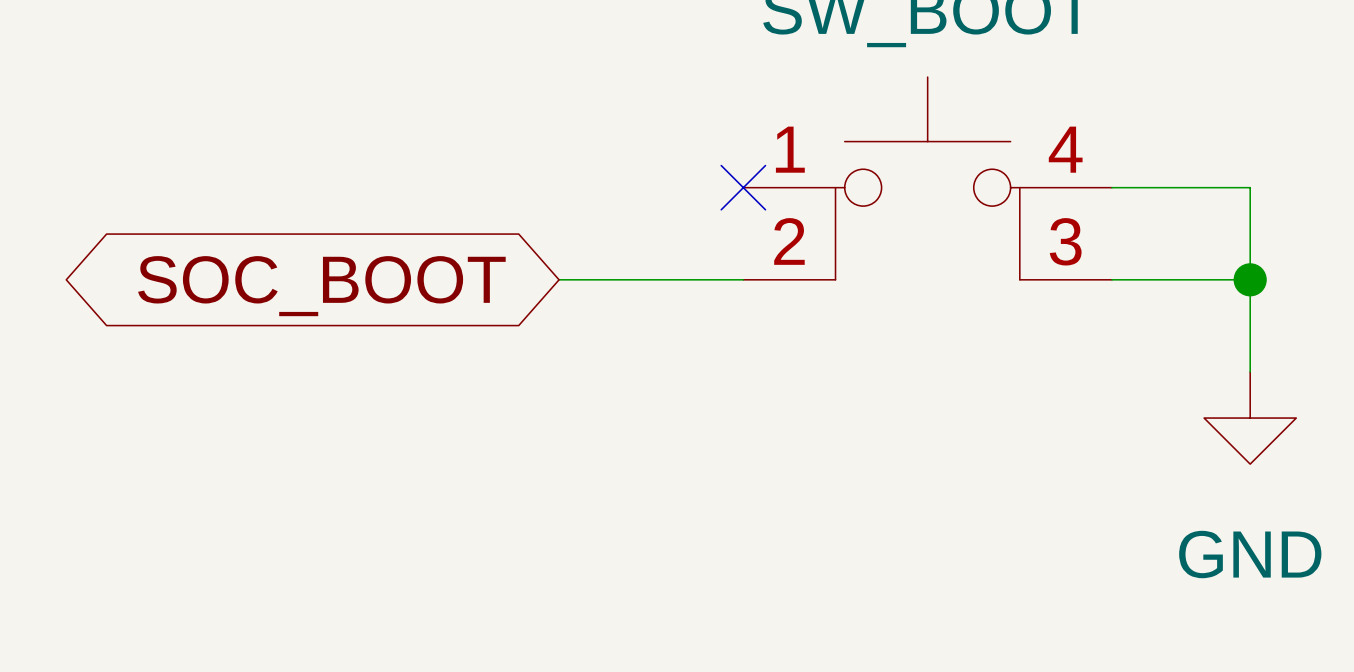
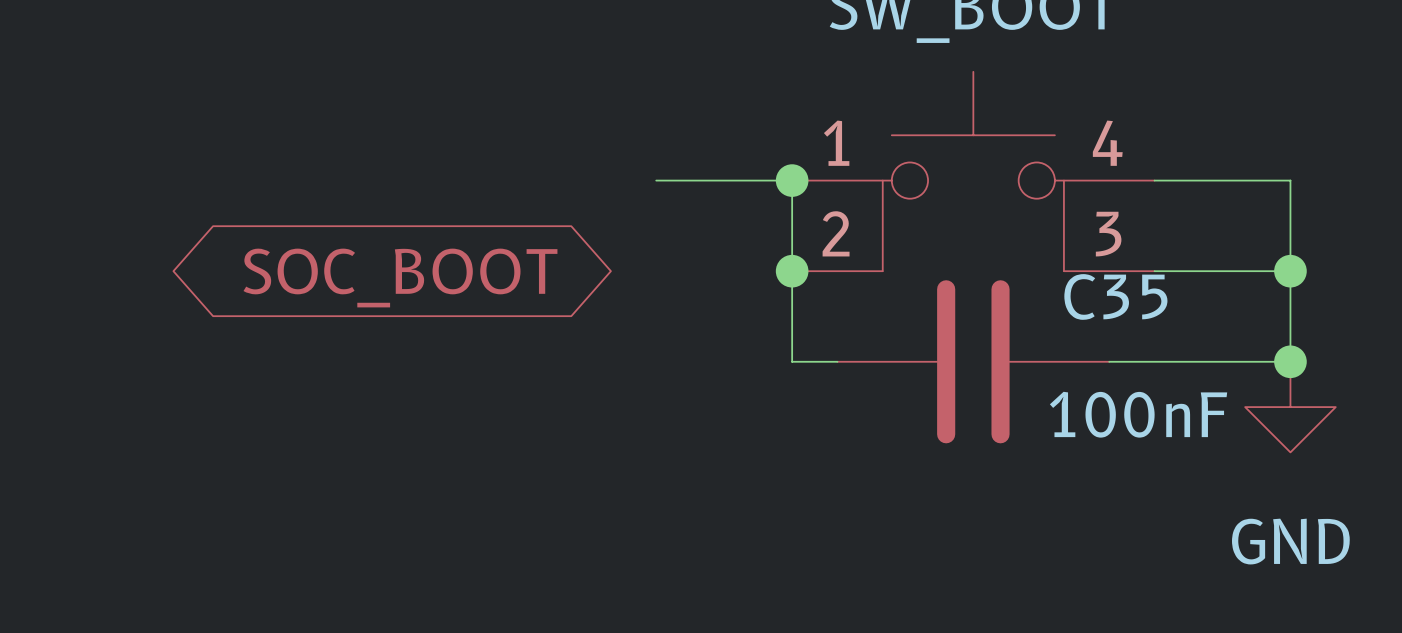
wire: none -> (656, 180) (792, 180) (792, 361) (837, 361)
junction: none -> (792, 180)
no-connect mark: (743, 187) -> none
wire: (559, 279) (743, 279) -> (1109, 361) (1290, 361)
junction: none -> (792, 271)
C35: none -> 100nF (973, 361)
junction: none -> (1290, 361)

